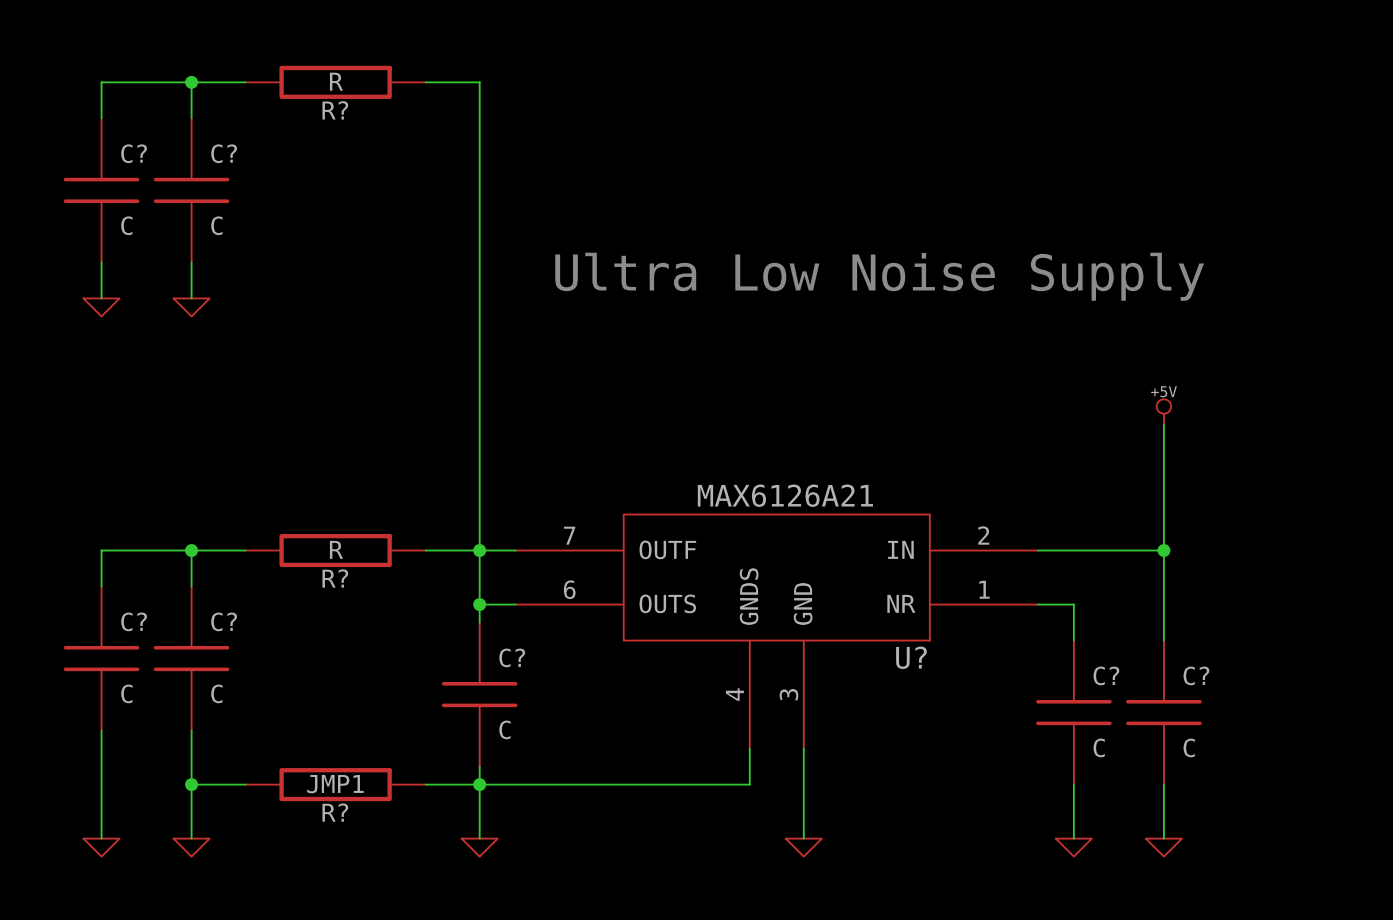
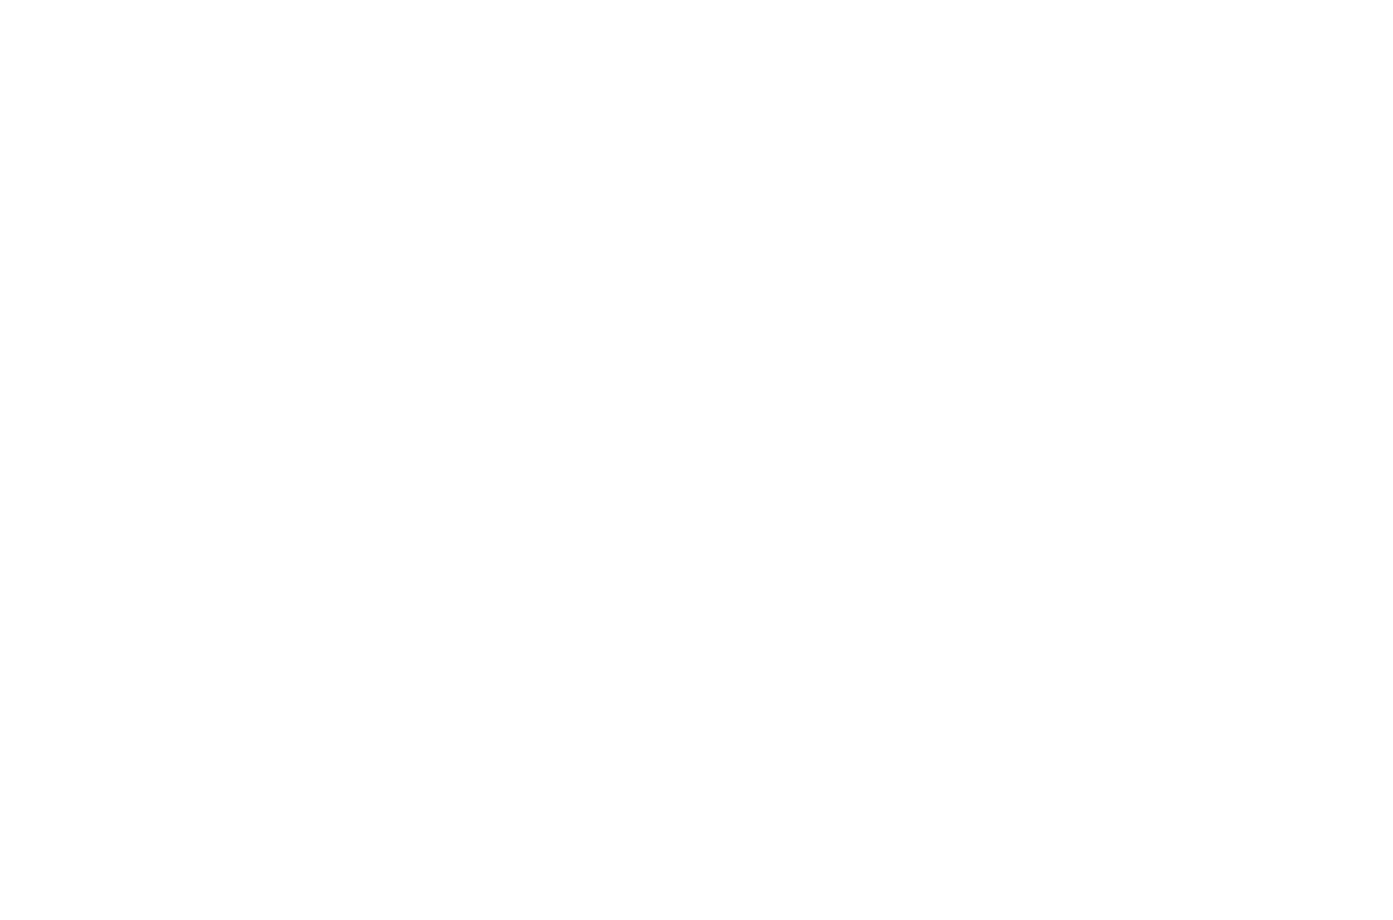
wire: (191, 82) (191, 118) -> none
junction: (191, 82) -> none
wire: (245, 82) (101, 82) (101, 118) -> none
R?: R (335, 82) -> none
wire: (425, 82) (479, 82) (479, 622) -> none
C?: C (101, 190) -> none
C?: C (191, 190) -> none
wire: (101, 262) (101, 298) -> none
wire: (191, 262) (191, 298) -> none
text: Ultra Low Noise Supply (879, 276) -> none
power symbol: (101, 307) -> none
power symbol: (191, 307) -> none
power symbol: +5V (1163, 411) -> none
wire: (1163, 424) (1163, 640) -> none
wire: (191, 550) (191, 586) -> none
junction: (191, 550) -> none
wire: (245, 550) (101, 550) (101, 586) -> none
R?: R (335, 550) -> none
wire: (425, 550) (515, 550) -> none
junction: (479, 550) -> none
wire: (1037, 550) (1163, 550) -> none
junction: (1163, 550) -> none
wire: (479, 604) (515, 604) -> none
junction: (479, 604) -> none
wire: (1037, 604) (1073, 604) (1073, 640) -> none
U?: MAX6126A21 (776, 631) -> none
C?: C (101, 658) -> none
C?: C (191, 658) -> none
C?: C (479, 694) -> none
C?: C (1073, 712) -> none
C?: C (1163, 712) -> none
wire: (101, 730) (101, 838) -> none
wire: (191, 730) (191, 838) -> none
wire: (749, 748) (749, 784) (425, 784) -> none
wire: (803, 748) (803, 838) -> none
wire: (479, 766) (479, 838) -> none
wire: (191, 784) (245, 784) -> none
junction: (191, 784) -> none
R?: JMP1 (335, 784) -> none
junction: (479, 784) -> none
wire: (1073, 784) (1073, 838) -> none
wire: (1163, 784) (1163, 838) -> none
power symbol: (101, 847) -> none
power symbol: (191, 847) -> none
power symbol: (479, 847) -> none
power symbol: (803, 847) -> none
power symbol: (1073, 847) -> none
power symbol: (1163, 847) -> none

